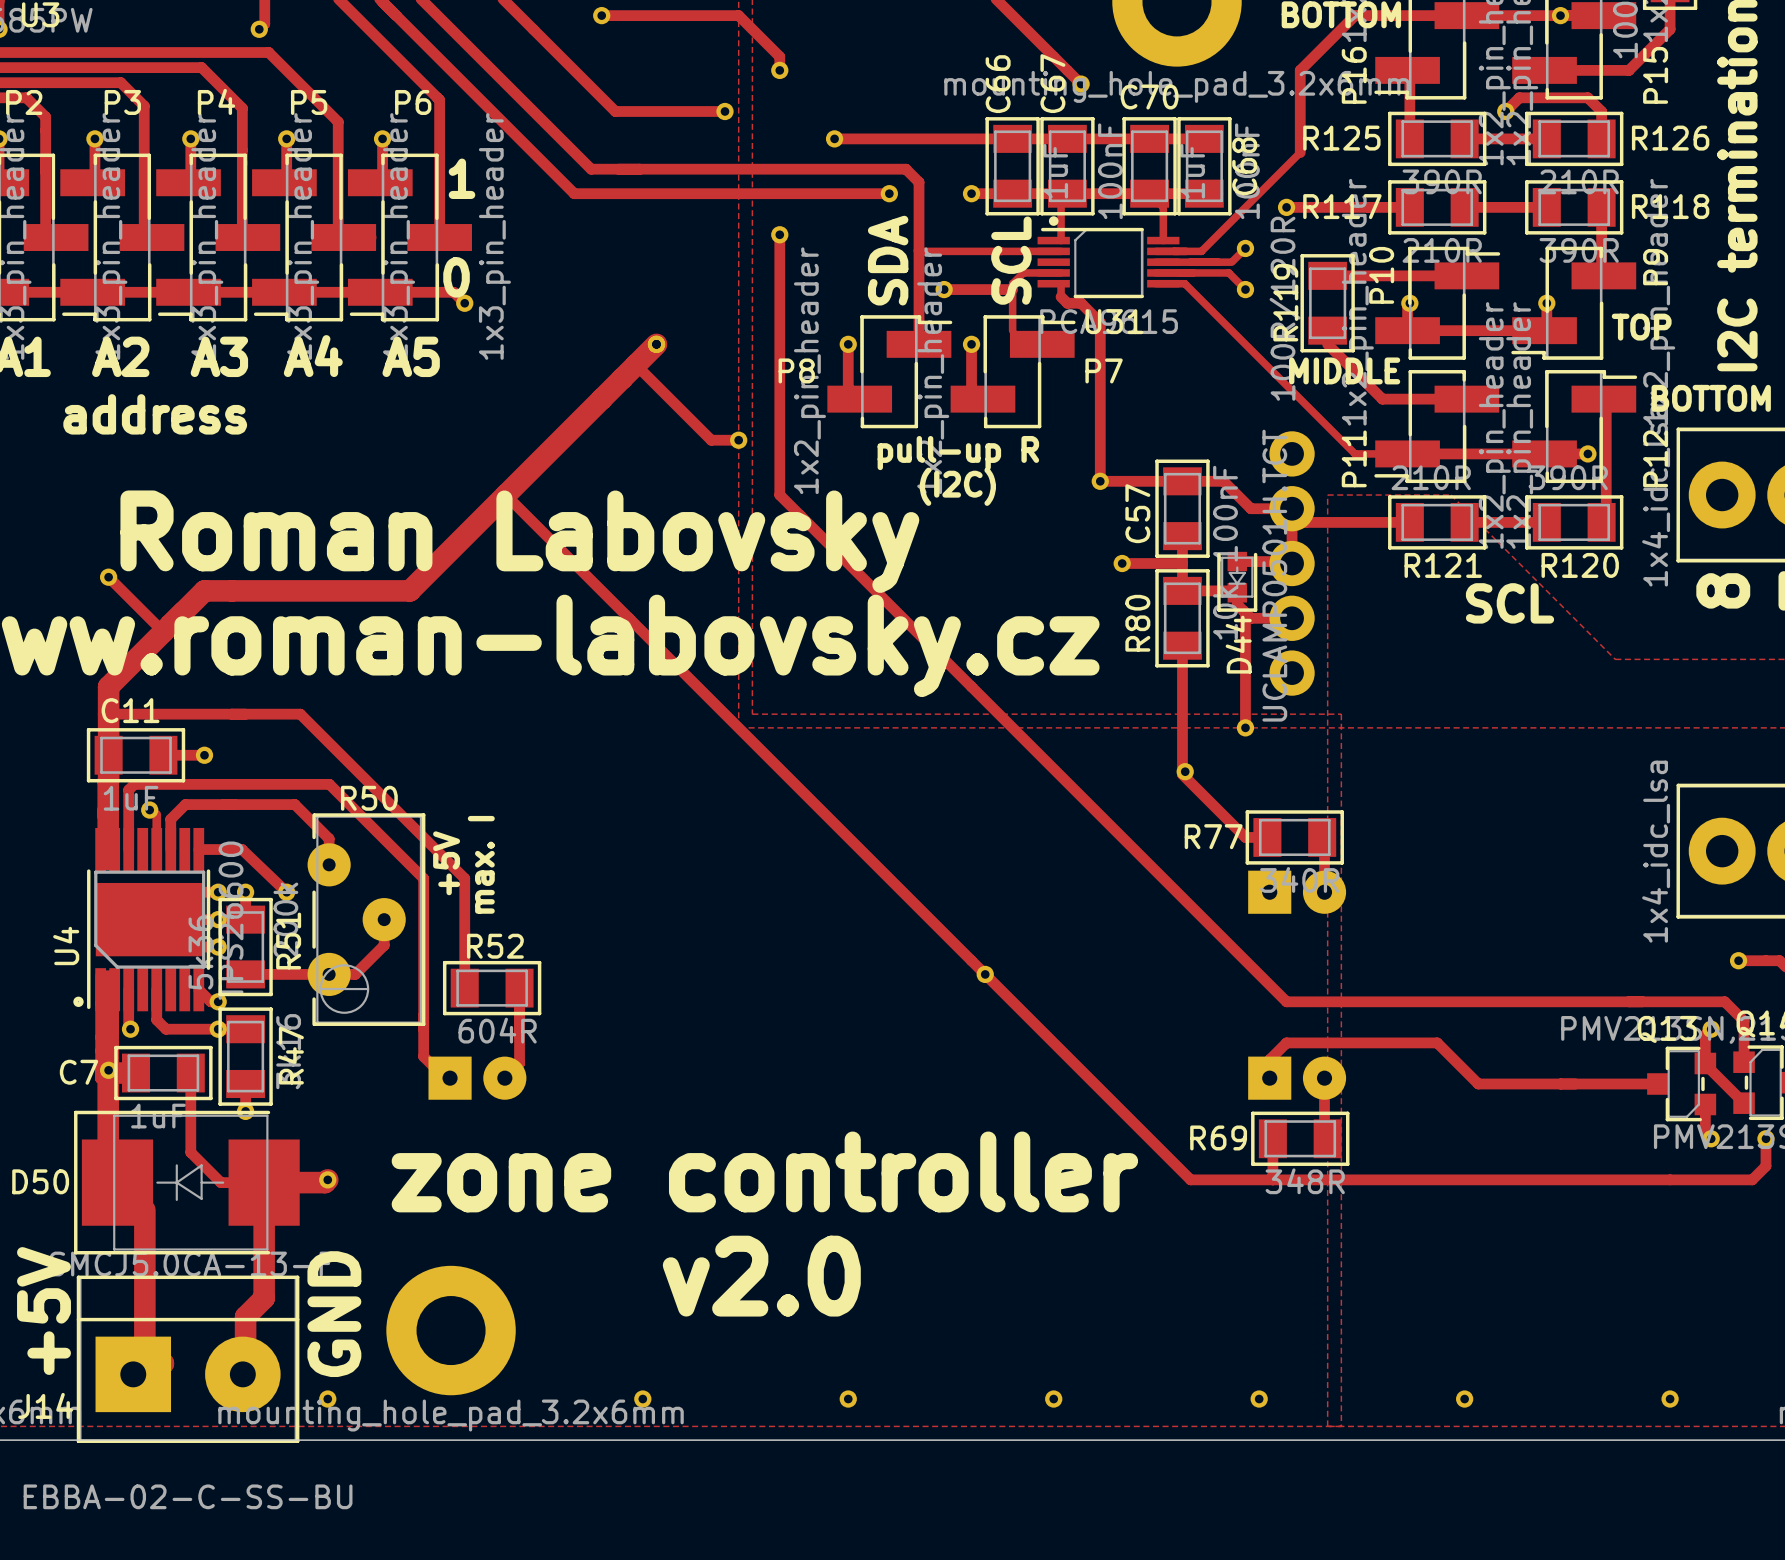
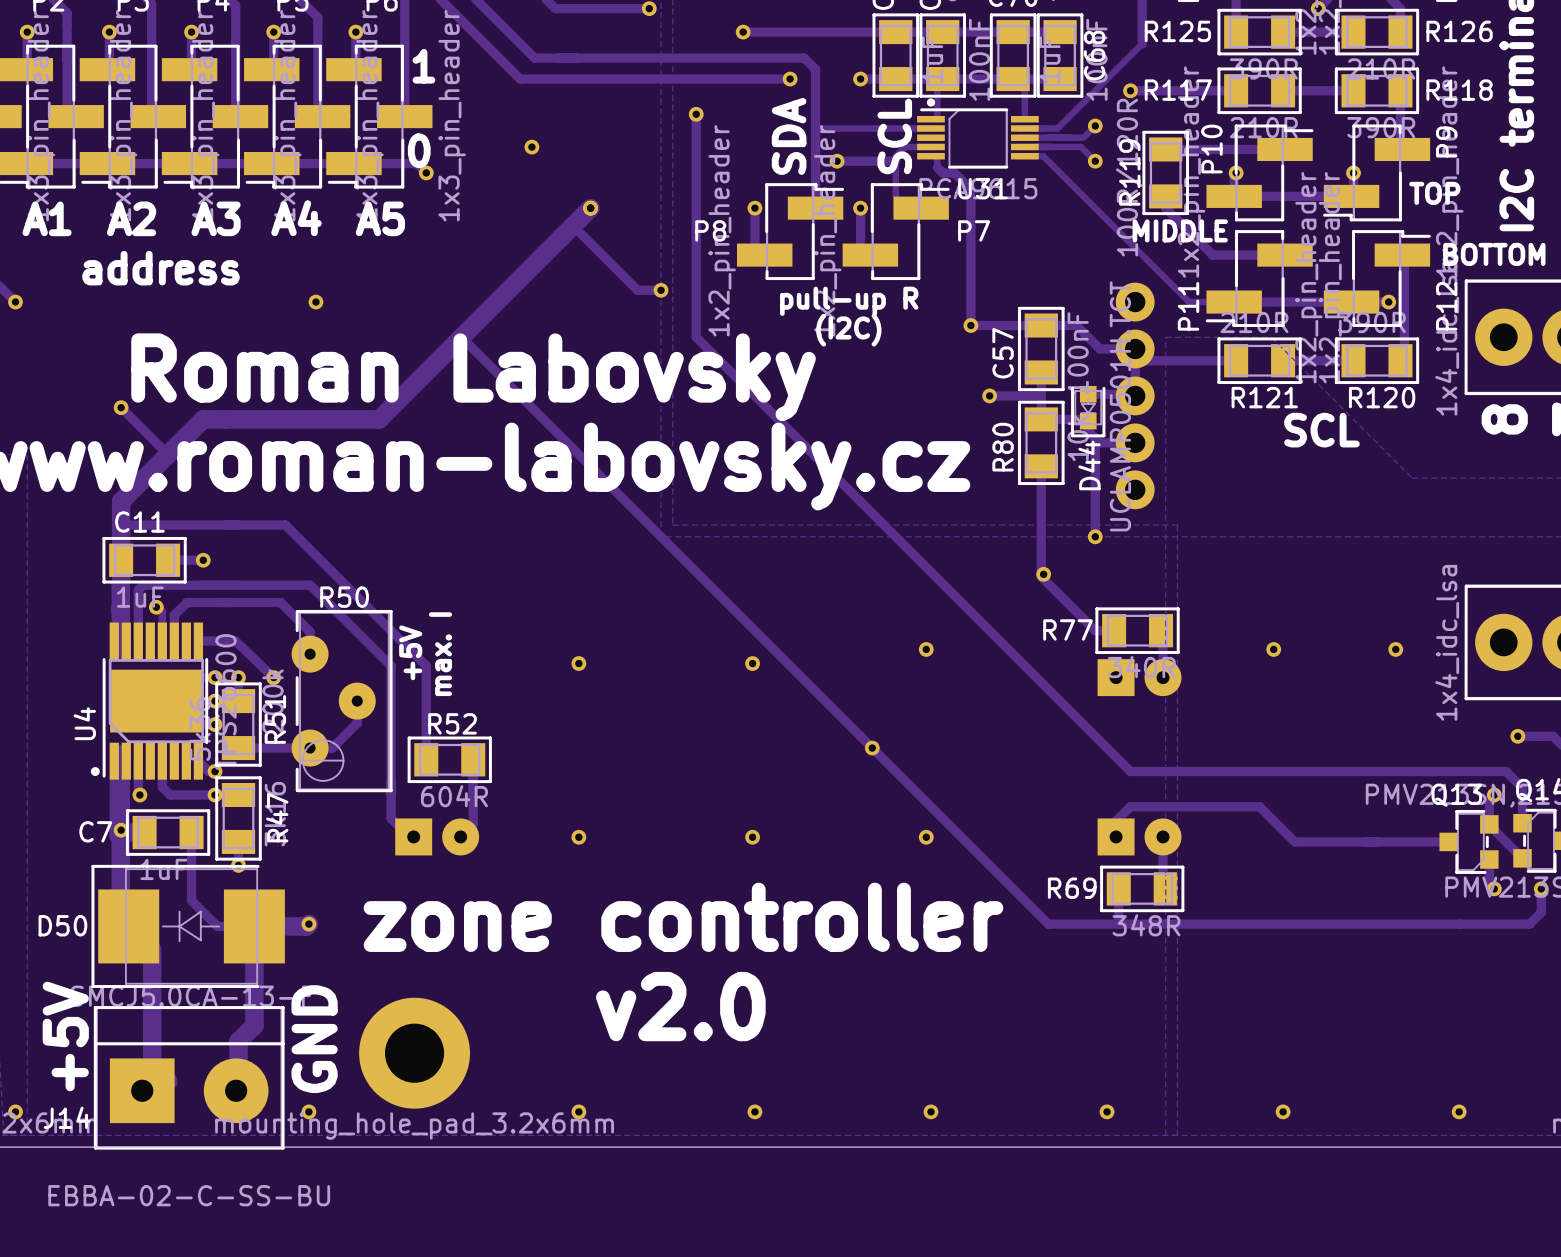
part: none -> (531, 147)
part: none -> (315, 302)
part: none -> (926, 649)
part: none -> (1273, 649)
part: none -> (1395, 649)
part: none -> (578, 663)
part: none -> (752, 663)
part: none -> (578, 837)
part: none -> (752, 837)
part: none -> (926, 837)

